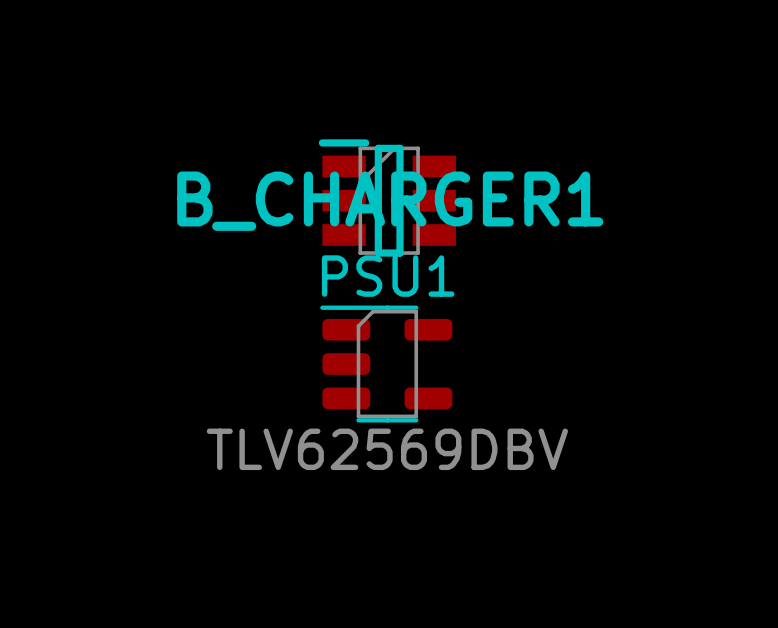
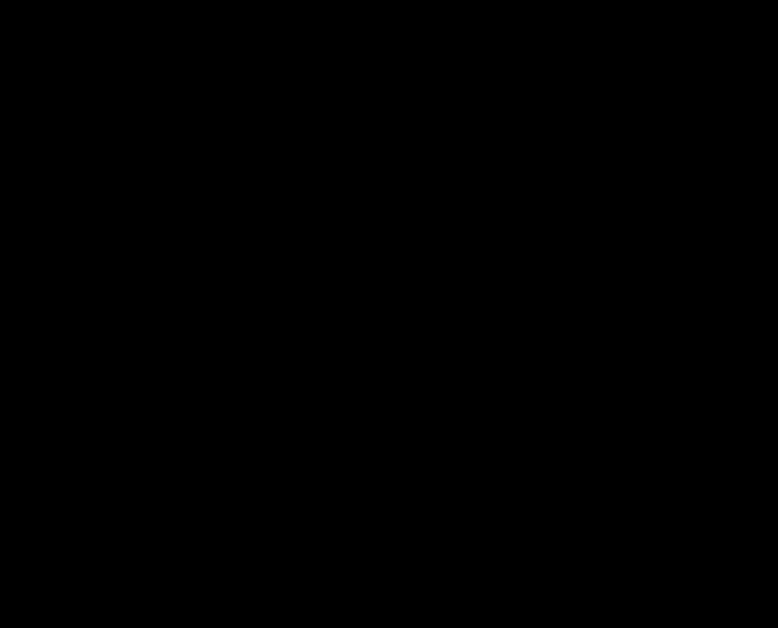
B_CHARGER1: (387, 197) -> none
PSU1: TLV62569DBV (386, 364) -> none

